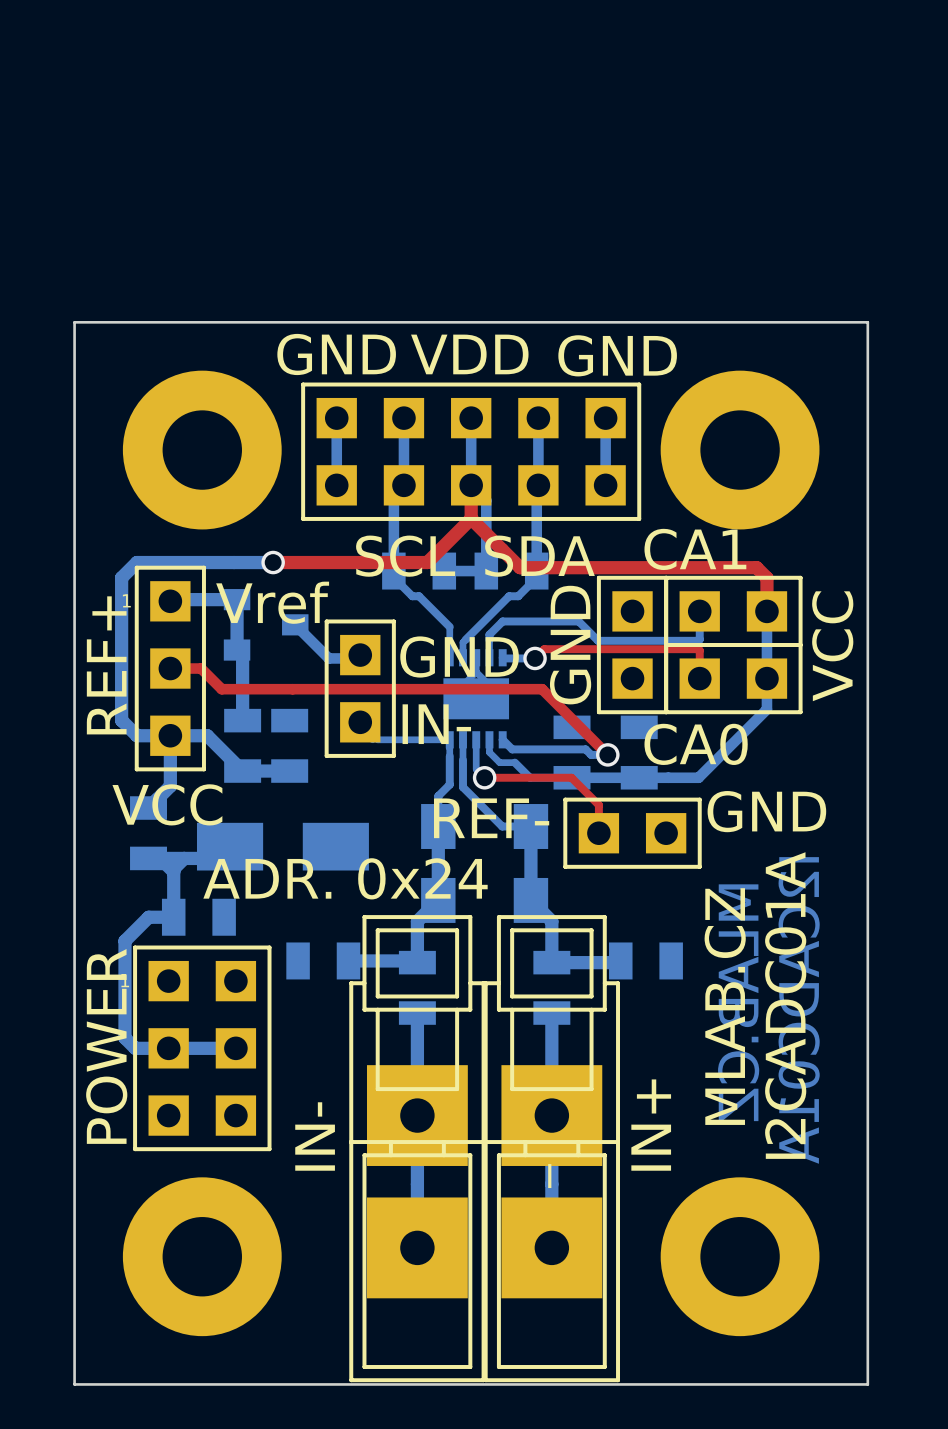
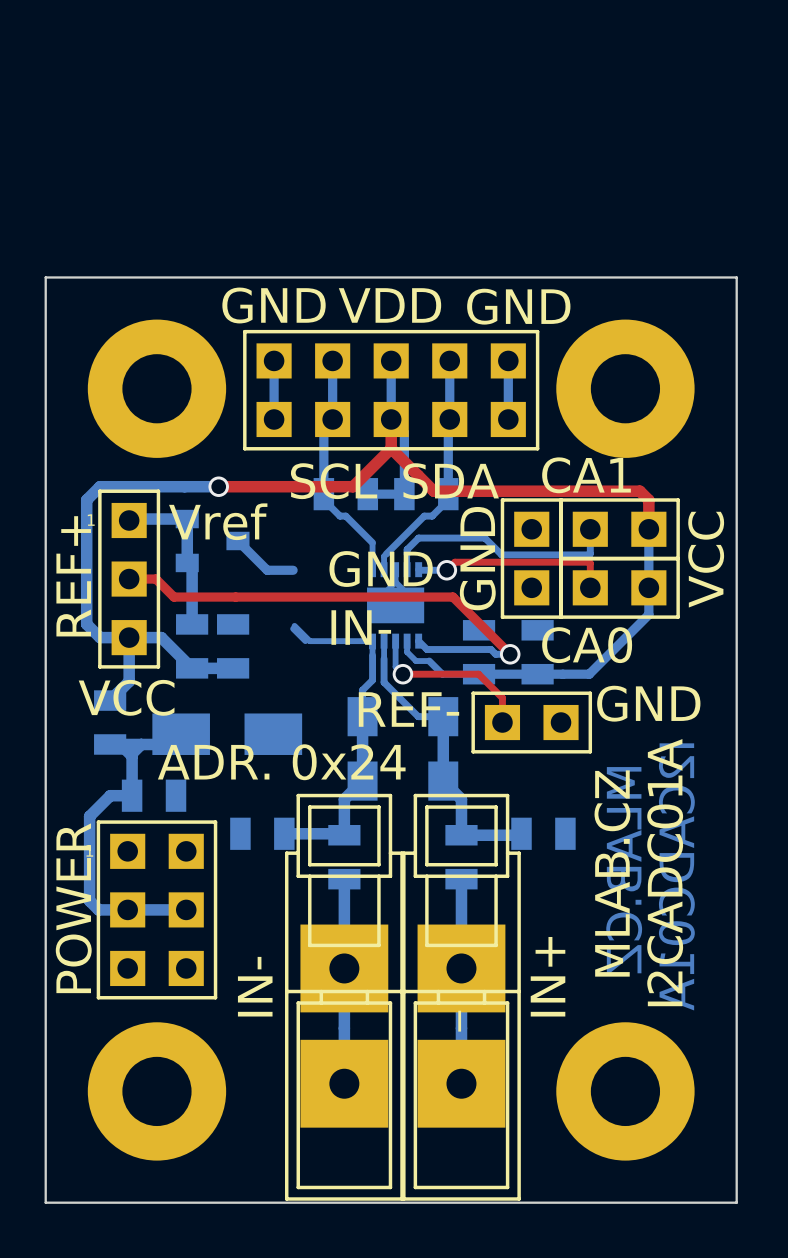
part: (360, 688) -> none

